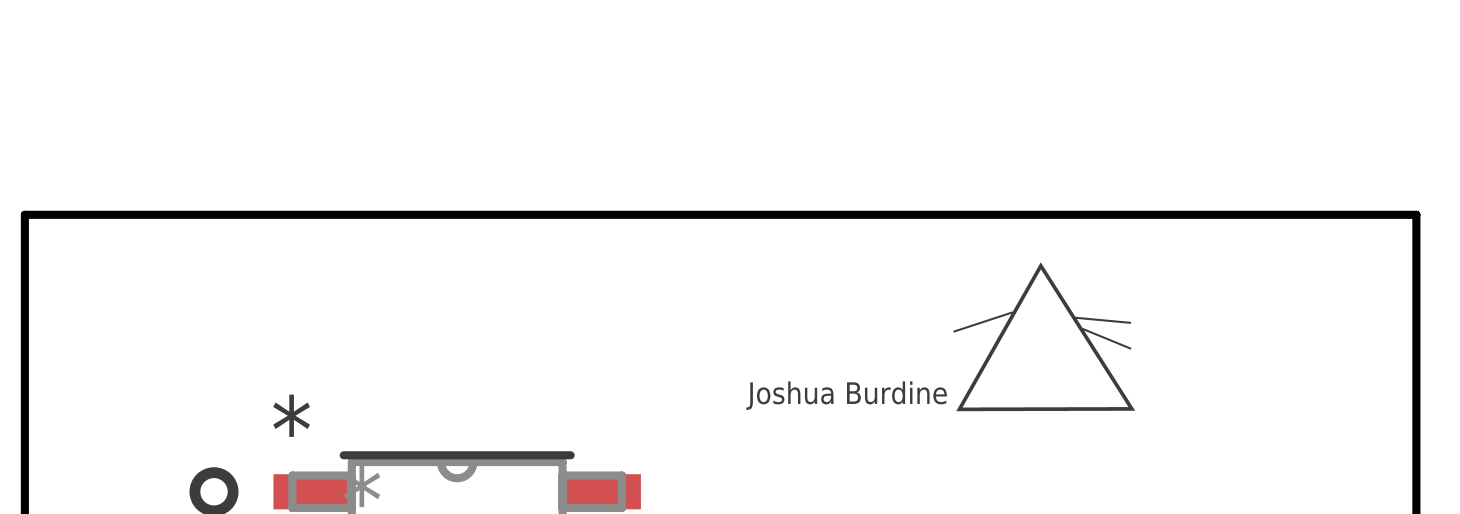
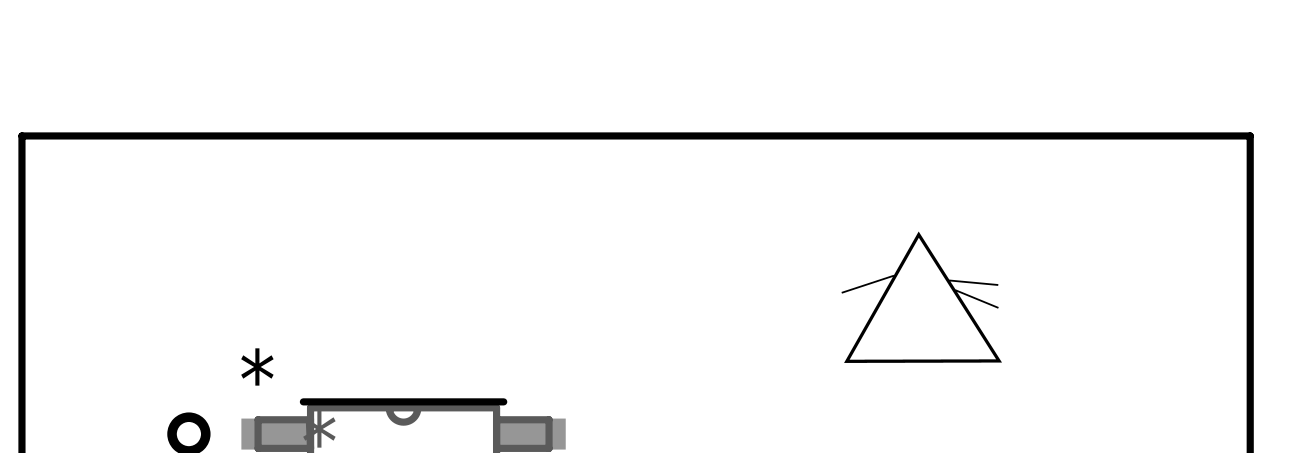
board edge: (24, 214) (1416, 214) -> (21, 189) (21, 135) (1250, 135) (1250, 189)
text: Joshua Burdine (846, 395) -> none

